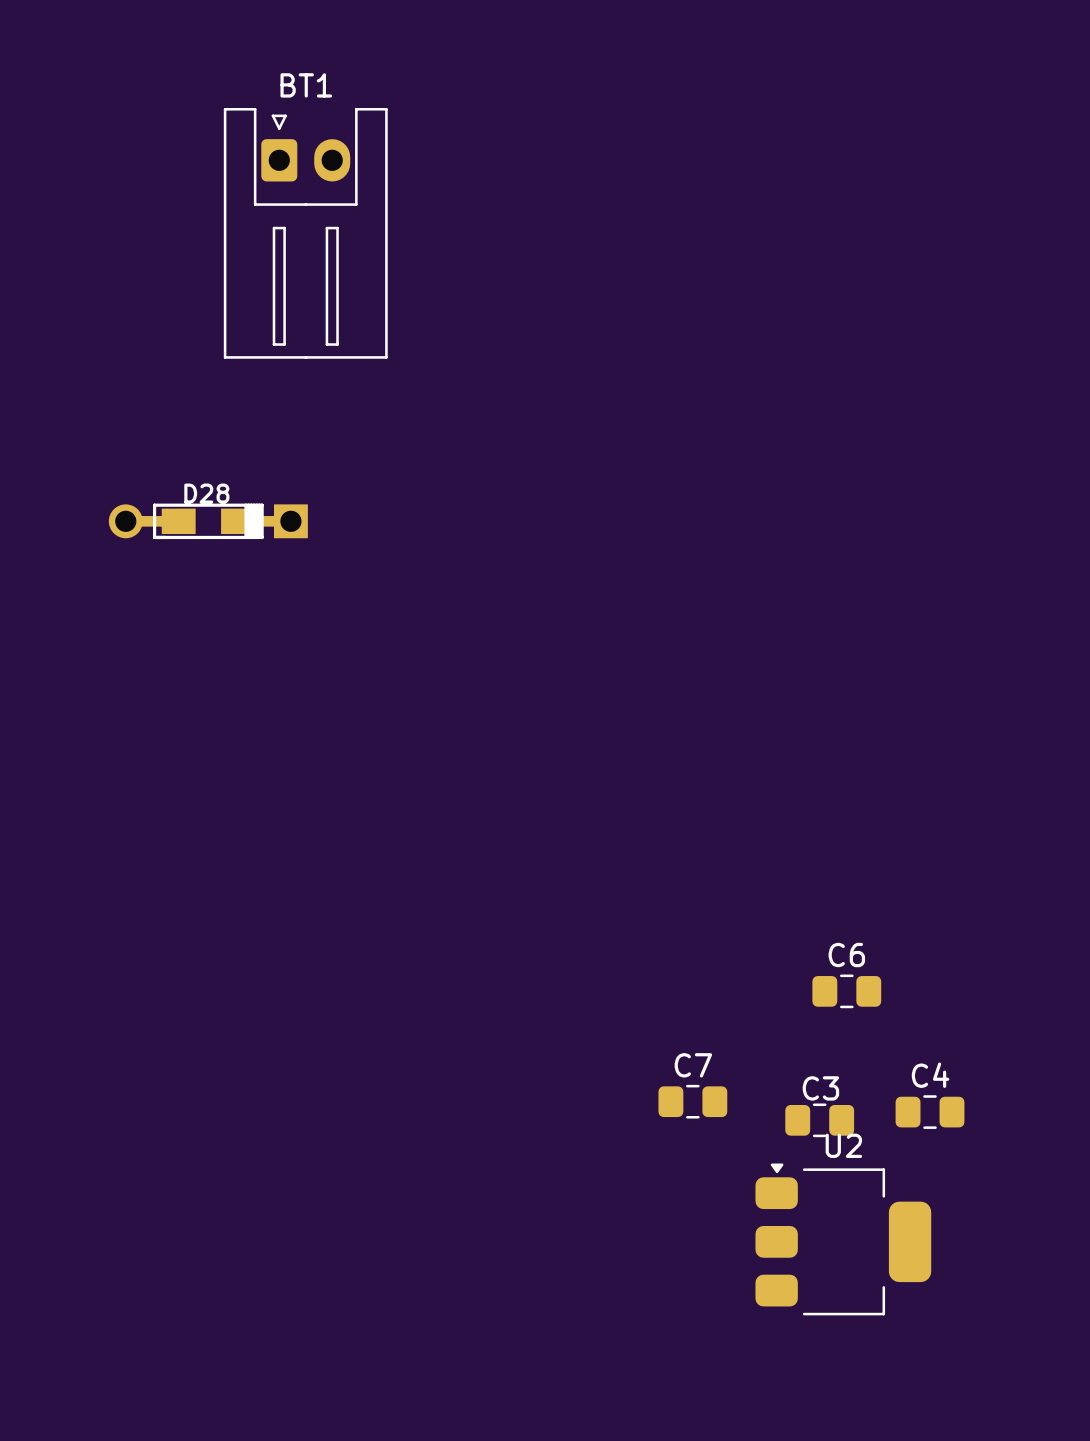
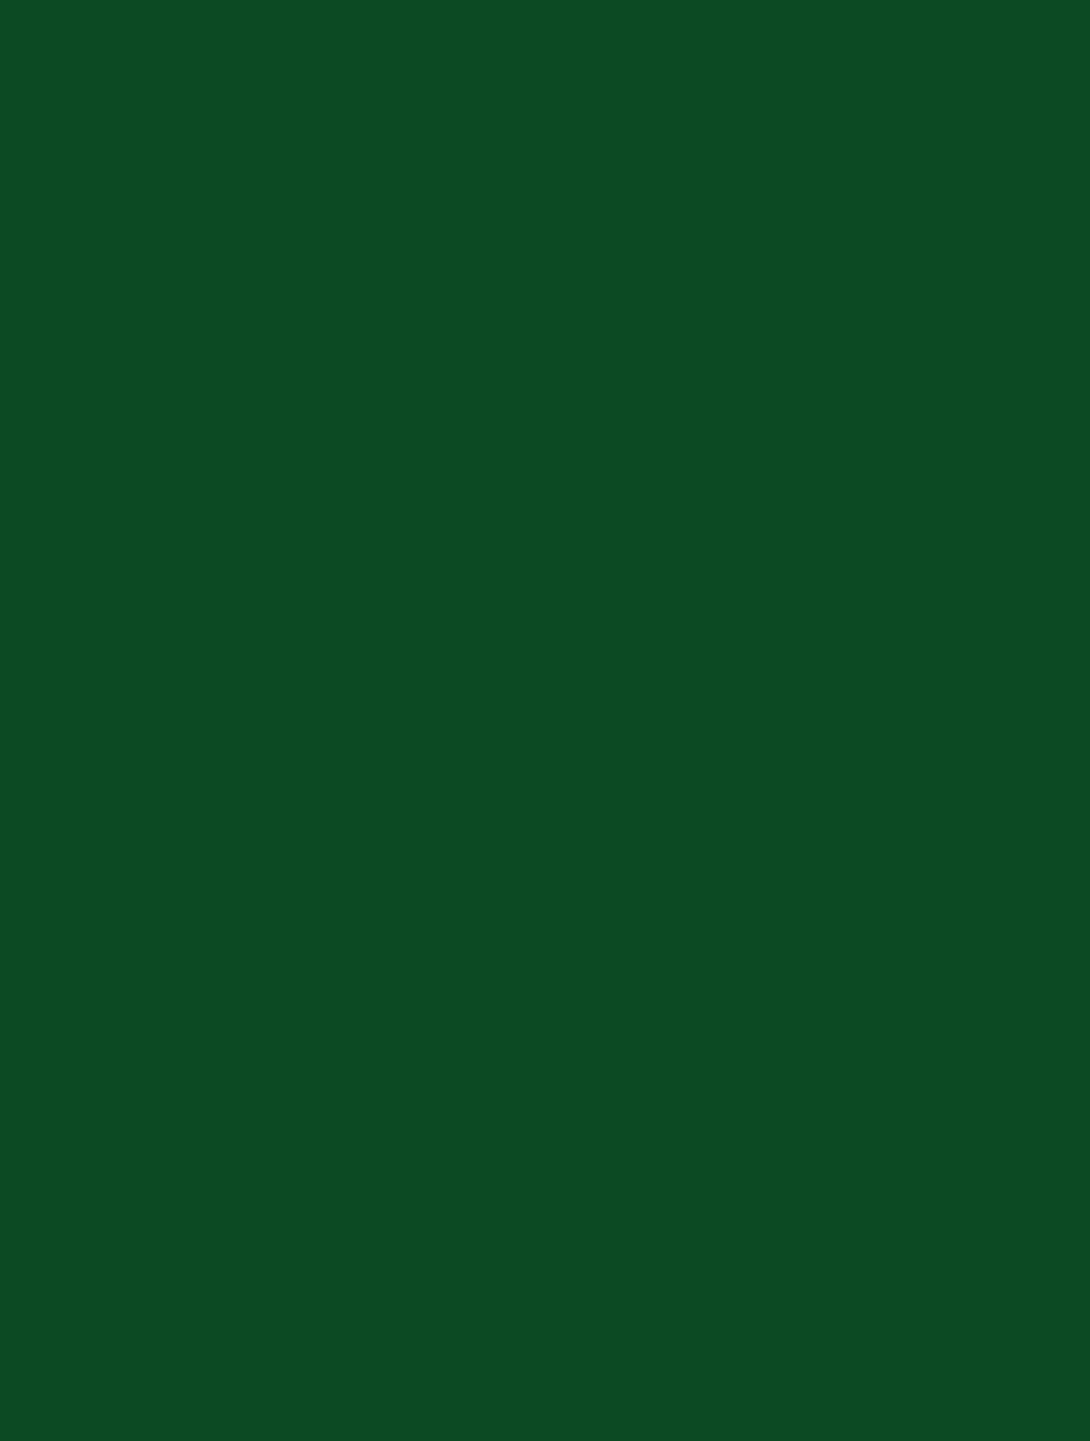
BT1: (305, 233) -> none
D28: (208, 521) -> none
C6: (846, 991) -> none
C7: (692, 1101) -> none
C4: (930, 1112) -> none
C3: (819, 1120) -> none
U2: (843, 1239) -> none

